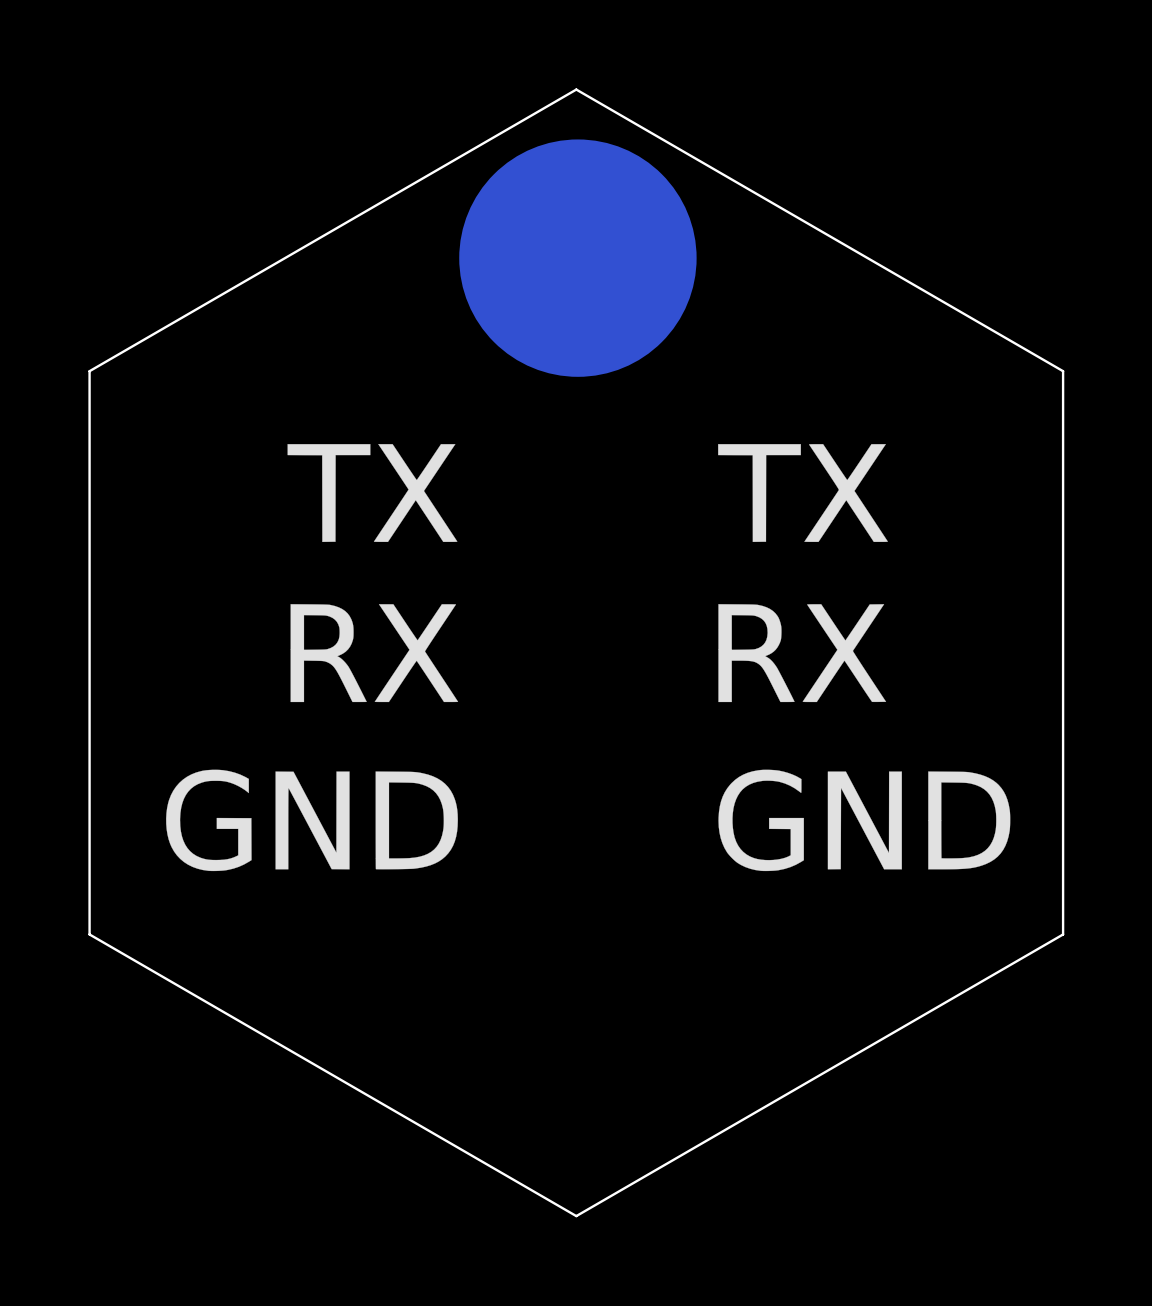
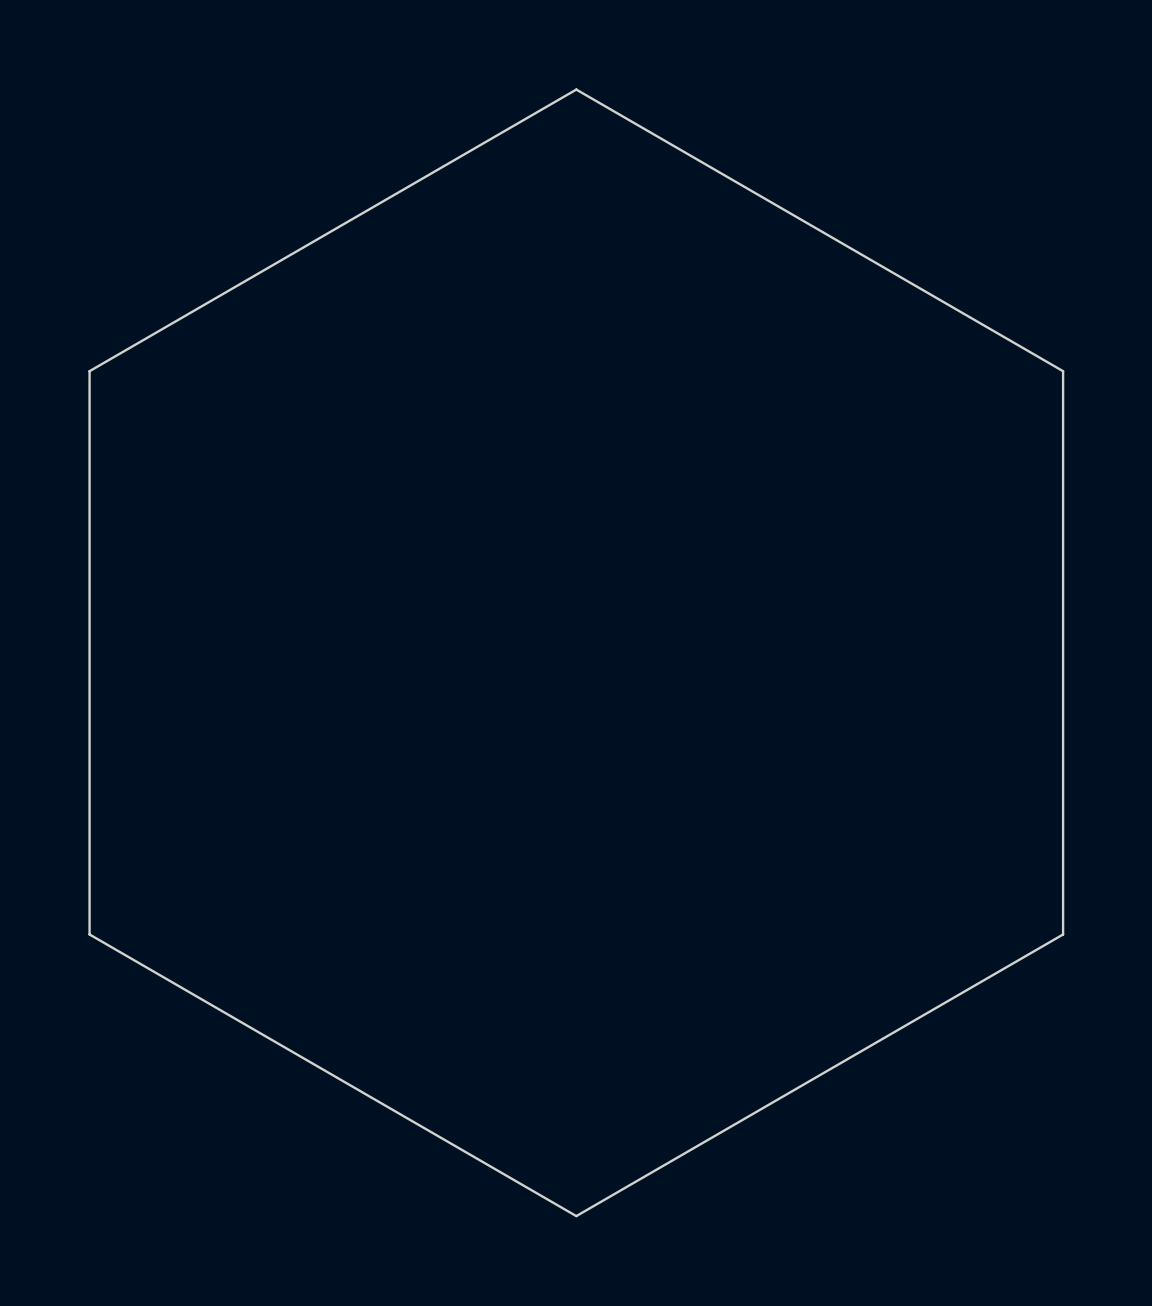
part: (577, 258) -> none
drawing: [166, 444, 1011, 872] -> none

